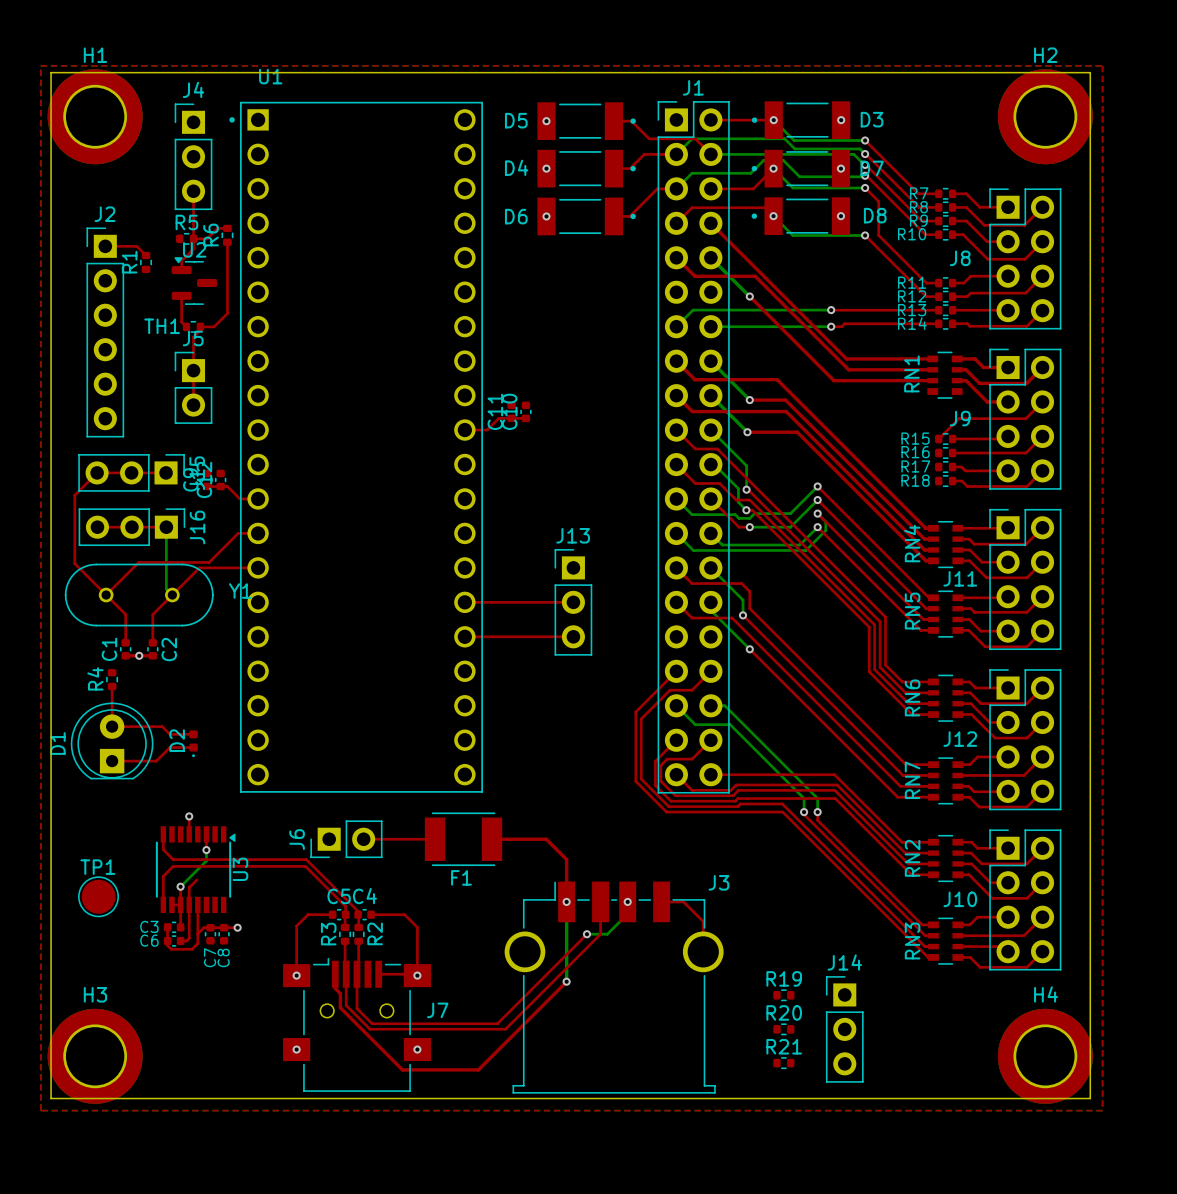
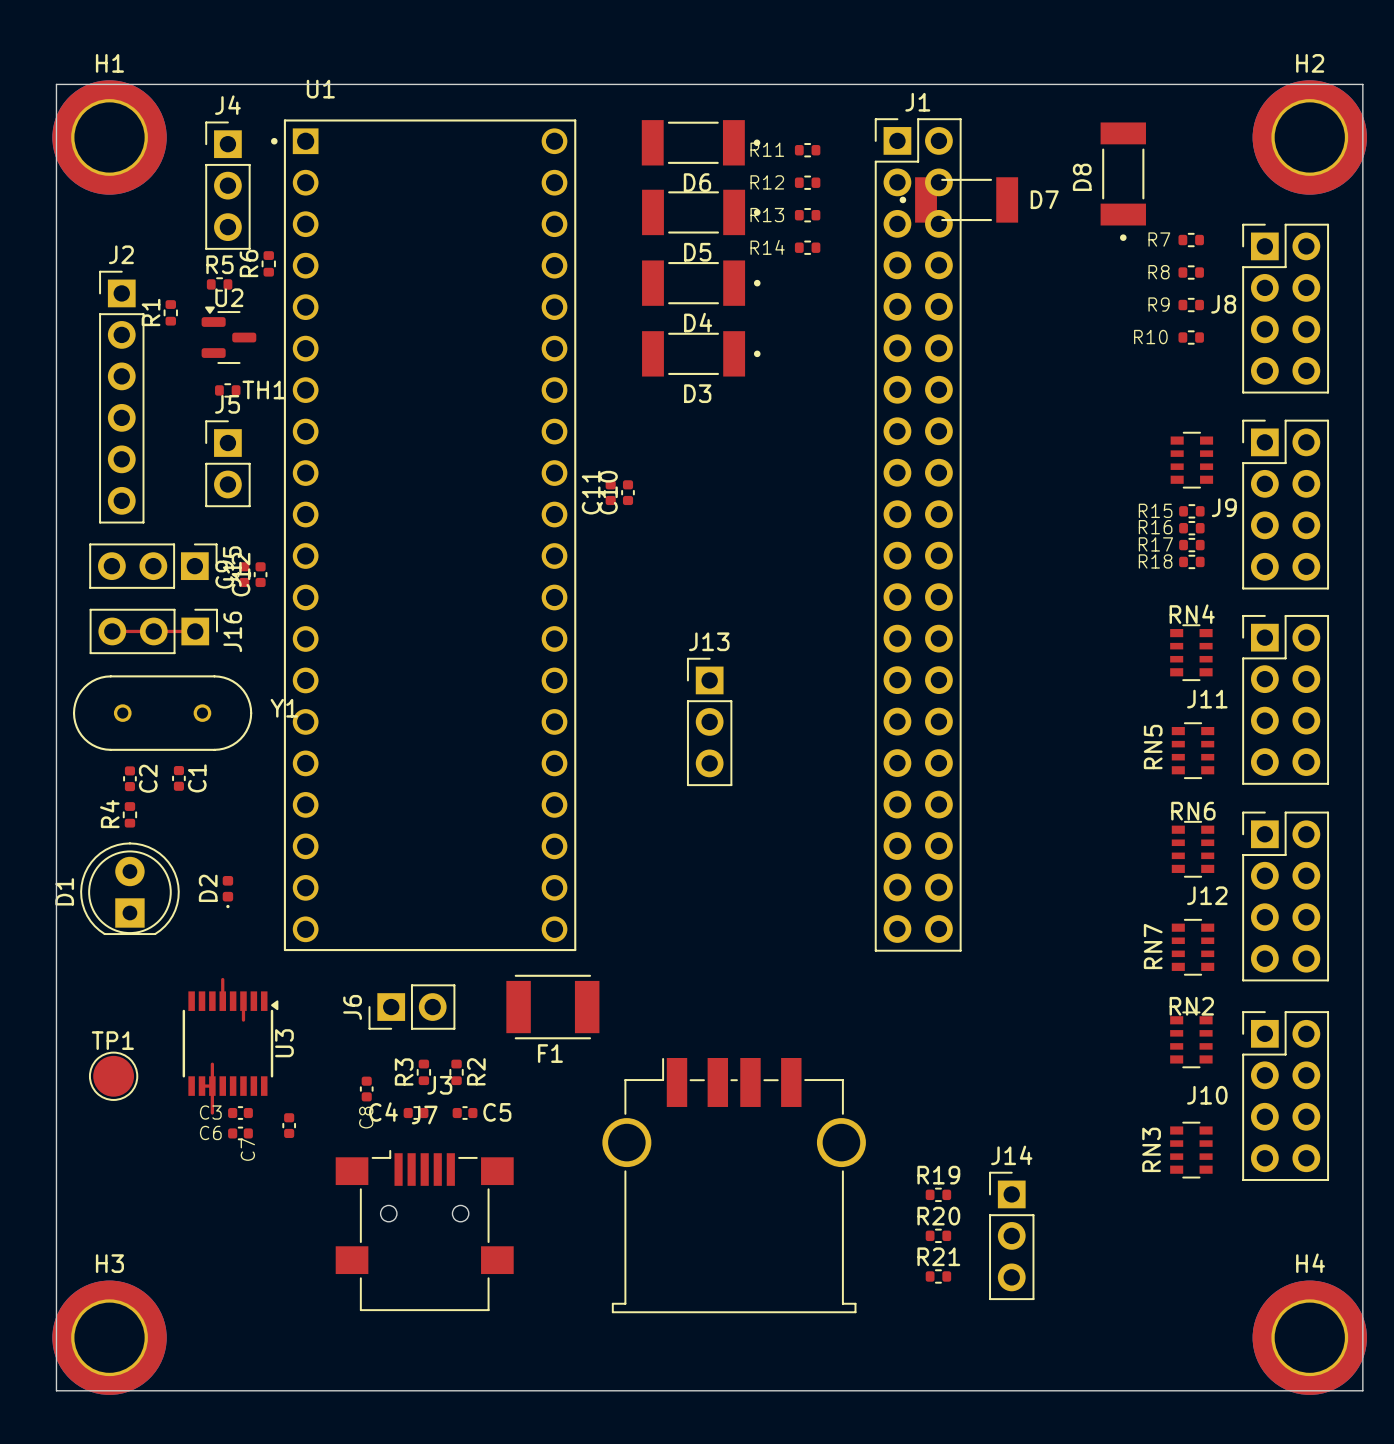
top zone outline: (40, 65) (1102, 65) (1102, 1110) (40, 1110) (40, 65) -> none
board edge: (1090, 72) (1090, 1098) (51, 1098) -> (1307, 84) (1362, 84) (1362, 1390) (56, 1390) (56, 1319)
H2 position: (1045, 116) -> (1309, 137)
top track: (710, 119) (773, 120) -> none
D3 name position: D3 (872, 119) -> D3 (697, 393)
D5 name: D5 (516, 120) -> D6 (697, 182)
bottom track: (773, 120) (794, 140) (865, 140) -> none
via: (773, 120) -> none
D3 rotation: 0° (801, 120) -> 180° (701, 353)
D3 position: (801, 120) -> (701, 353)
via: (841, 120) -> none
via: (546, 121) -> none
top track: (613, 121) (631, 121) (649, 138) (695, 138) (710, 154) -> none
top track: (865, 140) (918, 193) (938, 193) -> none
via: (865, 140) -> none
top track: (676, 154) (644, 154) (630, 168) (613, 168) -> none
bottom track: (710, 154) (853, 154) (865, 164) -> none
top track: (865, 154) (919, 207) (938, 207) -> none
bottom track: (865, 154) (860, 148) (794, 148) (784, 138) (692, 138) (676, 154) -> none
via: (865, 154) -> none
top track: (865, 164) (921, 221) (938, 221) -> none
via: (865, 164) -> none
D4 name position: D4 (516, 167) -> D4 (698, 322)
via: (546, 168) -> none
D4 position: (586, 168) -> (701, 283)
top track: (773, 168) (753, 188) (710, 188) -> none
bottom track: (773, 168) (792, 187) (865, 187) -> none
via: (773, 168) -> none
via: (840, 168) -> none
top track: (865, 175) (925, 234) (938, 234) -> none
bottom track: (865, 175) (799, 176) (783, 160) (763, 160) (750, 173) (692, 173) (676, 188) -> none
via: (865, 175) -> none
D5: none -> (701, 212)
top track: (865, 187) (878, 201) (878, 235) (926, 283) (938, 283) -> none
via: (865, 187) -> none
top track: (676, 188) (657, 188) (629, 216) (613, 216) -> none
top track: (193, 191) (193, 249) (181, 260) (181, 270) -> none
R7 position: (945, 193) -> (1191, 240)
top track: (952, 193) (966, 193) (979, 207) (1008, 207) -> none
R8 position: (945, 207) -> (1191, 272)
top track: (1042, 207) (1024, 225) (984, 225) (966, 207) (952, 207) -> none
D8 name position: D8 (875, 215) -> D8 (1082, 177)
via: (546, 216) -> none
D6: (586, 216) -> none
top track: (773, 216) (765, 207) (692, 207) (676, 223) -> none
bottom track: (773, 216) (792, 235) (865, 235) -> none
via: (773, 216) -> none
D8 rotation: 0° (800, 216) -> 90° counterclockwise (1123, 181)
D8 position: (800, 216) -> (1123, 181)
via: (840, 216) -> none
R9 position: (945, 221) -> (1191, 305)
top track: (952, 221) (966, 221) (987, 241) (1008, 241) -> none
top track: (710, 223) (846, 358) (932, 358) -> none
top track: (227, 228) (217, 228) (207, 238) (193, 238) -> none
R10 position: (945, 234) -> (1191, 337)
top track: (952, 234) (963, 234) (987, 259) (1025, 259) (1042, 241) -> none
R6 position: (227, 235) -> (268, 263)
top track: (865, 235) (926, 296) (938, 296) -> none
via: (865, 235) -> none
top track: (227, 242) (227, 313) (214, 326) (200, 326) (200, 330) (193, 337) (193, 405) -> none
top track: (105, 246) (136, 246) (146, 255) -> none
top track: (676, 257) (694, 276) (755, 276) (848, 369) (932, 369) -> none
bottom track: (710, 257) (749, 296) -> none
J8 name position: J8 (960, 258) -> J8 (1223, 304)
J8 position: (1025, 258) -> (1285, 308)
top track: (1008, 276) (970, 276) (963, 283) (952, 283) -> none
top track: (1042, 276) (1025, 293) (970, 293) (967, 296) (952, 296) -> none
R11 position: (945, 283) -> (807, 150)
top track: (181, 295) (181, 322) (186, 326) -> none
top track: (749, 296) (833, 380) (932, 380) -> none
via: (749, 296) -> none
R12 position: (945, 296) -> (807, 182)
top track: (831, 310) (938, 310) -> none
bottom track: (831, 310) (693, 310) (676, 326) -> none
via: (831, 310) -> none
R13 position: (945, 310) -> (807, 215)
top track: (952, 310) (1008, 310) -> none
top track: (1042, 310) (1026, 326) (969, 326) (967, 323) (952, 323) -> none
top track: (938, 323) (844, 323) (841, 326) (831, 326) -> none
R14 position: (945, 323) -> (807, 247)
TH1 name position: TH1 (162, 326) -> TH1 (263, 389)
bottom track: (710, 326) (831, 326) -> none
via: (831, 326) -> none
top track: (957, 358) (975, 358) (983, 367) (1008, 367) -> none
top track: (676, 361) (694, 379) (777, 379) (925, 528) (933, 528) -> none
bottom track: (710, 361) (749, 400) -> none
top track: (1042, 367) (1026, 383) (979, 383) (966, 369) (957, 369) -> none
RN1: (944, 375) -> none
top track: (957, 380) (966, 380) (987, 401) (1008, 401) -> none
part: none -> (1191, 460)
top track: (676, 395) (692, 411) (786, 411) (924, 549) (933, 549) -> none
bottom track: (710, 395) (747, 432) -> none
top track: (749, 400) (785, 400) (924, 539) (933, 539) -> none
via: (749, 400) -> none
top track: (1042, 401) (1025, 418) (959, 418) (938, 438) -> none
top track: (525, 418) (498, 418) (487, 430) (464, 430) -> none
J9 name position: J9 (960, 418) -> J9 (1224, 507)
J9 position: (1025, 419) -> (1285, 504)
top track: (676, 430) (695, 448) (717, 448) (885, 617) (885, 665) (902, 681) (933, 681) -> none
bottom track: (710, 430) (746, 465) (746, 489) -> none
top track: (747, 432) (797, 432) (925, 560) (933, 560) -> none
via: (747, 432) -> none
top track: (1008, 436) (1005, 438) (952, 438) -> none
top track: (1042, 436) (1025, 453) (952, 453) -> none
R15 position: (945, 438) -> (1191, 511)
J1 position: (693, 447) -> (918, 534)
R16 position: (945, 453) -> (1191, 528)
top track: (676, 464) (695, 483) (719, 483) (736, 500) (749, 500) (874, 624) (874, 669) (908, 703) (933, 703) -> none
bottom track: (710, 464) (714, 464) (738, 488) (738, 502) (746, 510) -> none
R17 position: (945, 467) -> (1191, 545)
top track: (952, 467) (961, 467) (965, 470) (1008, 470) -> none
top track: (1042, 470) (1026, 486) (967, 486) (961, 481) (952, 481) -> none
top track: (166, 472) (97, 472) (74, 495) (74, 563) (125, 614) (125, 642) -> none
R18 position: (945, 481) -> (1191, 561)
top track: (207, 486) (227, 486) (239, 498) (258, 498) -> none
top track: (817, 486) (928, 597) (933, 597) -> none
bottom track: (817, 486) (790, 513) (754, 513) (749, 518) (738, 518) (735, 514) (692, 514) (676, 499) -> none
via: (817, 486) -> none
top track: (746, 489) (880, 621) (880, 667) (905, 692) (933, 692) -> none
via: (746, 489) -> none
top track: (710, 499) (739, 527) (749, 527) -> none
top track: (817, 500) (926, 608) (933, 608) -> none
bottom track: (817, 500) (790, 527) (749, 527) -> none
via: (817, 500) -> none
top track: (746, 510) (752, 510) (869, 627) (869, 671) (911, 714) (933, 714) -> none
via: (746, 510) -> none
top track: (817, 513) (923, 619) (933, 619) -> none
bottom track: (817, 513) (825, 521) (825, 530) (805, 550) (693, 550) (676, 533) -> none
via: (817, 513) -> none
bottom track: (166, 527) (166, 589) (172, 595) -> none
via: (749, 527) -> none
top track: (817, 527) (920, 630) (933, 630) -> none
bottom track: (817, 527) (799, 545) (722, 545) (710, 533) -> none
via: (817, 527) -> none
top track: (1008, 527) (957, 528) -> none
top track: (1042, 527) (1026, 544) (974, 544) (969, 539) (957, 539) -> none
top track: (258, 533) (238, 533) (209, 562) (138, 562) (106, 595) -> none
RN4 name rotation: 0° (912, 543) -> 90° clockwise (1192, 614)
RN4 position: (945, 544) -> (1191, 652)
top track: (957, 549) (969, 549) (982, 562) (1008, 562) -> none
top track: (957, 560) (969, 560) (986, 577) (1026, 577) (1042, 562) -> none
top track: (258, 567) (199, 567) (152, 614) (152, 642) -> none
top track: (676, 567) (692, 583) (741, 583) (749, 591) (749, 608) (905, 764) (933, 764) -> none
bottom track: (710, 567) (743, 600) (743, 615) -> none
J11 position: (1025, 579) -> (1285, 699)
top track: (1008, 596) (957, 597) -> none
top track: (1042, 596) (1026, 612) (974, 612) (970, 608) (957, 608) -> none
top track: (464, 602) (573, 602) -> none
J13 position: (573, 602) -> (709, 721)
top track: (676, 602) (692, 618) (732, 618) (900, 786) (933, 786) -> none
bottom track: (710, 602) (710, 610) (749, 649) -> none
RN5 position: (945, 614) -> (1193, 750)
top track: (743, 615) (903, 775) (933, 775) -> none
via: (743, 615) -> none
top track: (957, 619) (969, 619) (980, 631) (1008, 631) -> none
top track: (957, 630) (968, 630) (985, 646) (1026, 646) (1042, 631) -> none
top track: (464, 636) (573, 636) -> none
C2: none -> (129, 778)
C1: (125, 649) -> none
C2 name: C2 (169, 649) -> C1 (197, 778)
top track: (749, 649) (897, 797) (933, 797) -> none
via: (749, 649) -> none
top track: (125, 655) (152, 655) -> none
via: (139, 655) -> none
top track: (676, 671) (635, 711) (635, 781) (666, 812) (782, 812) (928, 957) (933, 957) -> none
top track: (710, 671) (692, 690) (669, 690) (641, 718) (641, 779) (668, 806) (737, 806) (740, 803) (782, 803) (924, 946) (933, 946) -> none
top track: (957, 681) (969, 681) (975, 688) (1008, 688) -> none
top track: (112, 686) (112, 726) (162, 726) (170, 734) (193, 734) -> none
top track: (1042, 688) (1026, 703) (980, 703) (970, 692) (957, 692) -> none
RN6 name rotation: 0° (912, 697) -> 90° clockwise (1193, 811)
RN6 position: (945, 698) -> (1193, 849)
top track: (957, 703) (970, 703) (989, 722) (1008, 722) -> none
bottom track: (676, 705) (695, 724) (730, 724) (804, 798) (804, 812) -> none
bottom track: (710, 705) (724, 705) (817, 798) (817, 812) -> none
top track: (957, 714) (971, 714) (995, 738) (1026, 738) (1042, 722) -> none
J12 position: (1025, 739) -> (1285, 896)
top track: (676, 740) (655, 761) (655, 785) (671, 801) (735, 801) (738, 798) (835, 798) (911, 874) (933, 874) -> none
top track: (710, 740) (692, 759) (667, 759) (660, 765) (660, 781) (675, 795) (733, 795) (738, 790) (834, 790) (908, 863) (933, 863) -> none
top track: (193, 747) (169, 747) (156, 761) (112, 761) -> none
top track: (1008, 756) (977, 756) (969, 764) (957, 764) -> none
top track: (1042, 756) (1024, 775) (957, 775) -> none
top track: (676, 774) (692, 790) (730, 790) (736, 784) (837, 784) (905, 853) (933, 853) -> none
top track: (710, 774) (834, 774) (902, 842) (933, 842) -> none
RN7 position: (945, 780) -> (1193, 947)
top track: (957, 786) (968, 786) (974, 791) (1008, 791) -> none
top track: (1042, 791) (1026, 807) (979, 807) (969, 797) (957, 797) -> none
top track: (804, 812) (804, 814) (925, 935) (933, 935) -> none
via: (804, 812) -> none
top track: (817, 812) (817, 820) (922, 924) (933, 924) -> none
via: (817, 812) -> none
via: (189, 816) -> none
top track: (163, 834) (163, 849) (173, 859) (306, 859) (358, 911) (358, 927) -> none
top track: (363, 839) (435, 839) -> none
top track: (492, 839) (546, 839) (566, 859) (566, 901) -> none
top track: (957, 842) (971, 842) (977, 848) (1008, 848) -> none
top track: (1042, 848) (1026, 863) (981, 863) (971, 853) (957, 853) -> none
bottom track: (206, 850) (206, 860) (180, 886) -> none
via: (206, 850) -> none
RN2 name rotation: 0° (912, 858) -> 90° clockwise (1191, 1006)
RN2 position: (945, 858) -> (1191, 1039)
top track: (957, 863) (971, 863) (990, 882) (1008, 882) -> none
top track: (957, 874) (968, 874) (992, 898) (1026, 898) (1042, 882) -> none
top track: (196, 879) (189, 887) (189, 938) (186, 941) (180, 941) -> none
J3 name position: J3 (718, 882) -> J3 (439, 1085)
via: (180, 886) -> none
C5 name position: C5 (339, 896) -> C5 (497, 1112)
C4 name position: C4 (364, 896) -> C4 (383, 1112)
J10 position: (1025, 899) -> (1285, 1096)
bottom track: (566, 901) (566, 981) -> none
via: (566, 901) -> none
top track: (600, 901) (600, 934) (505, 1029) (369, 1029) (346, 1005) (345, 941) -> none
bottom track: (627, 901) (627, 913) (607, 934) (586, 934) -> none
via: (627, 901) -> none
top track: (661, 901) (683, 901) (703, 921) (703, 951) -> none
top track: (163, 904) (163, 876) (173, 866) (305, 866) (345, 906) (345, 927) -> none
top track: (197, 904) (197, 943) (192, 949) (171, 949) (167, 945) (167, 927) -> none
top track: (332, 914) (308, 914) (296, 926) (296, 975) -> none
C5 position: (339, 914) -> (465, 1113)
C4 position: (364, 914) -> (416, 1113)
top track: (371, 914) (404, 914) (417, 927) (417, 975) (378, 974) -> none
top track: (1008, 917) (977, 917) (969, 924) (957, 924) -> none
top track: (1042, 917) (1024, 935) (957, 935) -> none
C3 position: (174, 927) -> (240, 1113)
top track: (237, 927) (203, 927) (197, 933) -> none
via: (237, 927) -> none
C7 position: (210, 934) -> (289, 1125)
C8 position: (224, 934) -> (366, 1089)
R3 position: (345, 934) -> (423, 1072)
R2 position: (358, 934) -> (456, 1072)
top track: (586, 934) (497, 1023) (372, 1023) (357, 1008) (358, 941) -> none
via: (586, 934) -> none
C6 position: (174, 941) -> (240, 1133)
RN3 position: (945, 941) -> (1191, 1150)
top track: (957, 946) (1002, 946) (1008, 951) -> none
top track: (1042, 951) (1026, 967) (980, 967) (970, 957) (957, 957) -> none
top track: (335, 974) (335, 988) (340, 993) (340, 1007) (402, 1069) (478, 1069) (566, 981) -> none
via: (296, 975) -> none
via: (417, 975) -> none
via: (566, 981) -> none
J7 name position: J7 (437, 1010) -> J7 (424, 1115)
via: (296, 1049) -> none
via: (417, 1049) -> none
H3 position: (95, 1056) -> (109, 1337)
H4 position: (1045, 1056) -> (1309, 1337)

